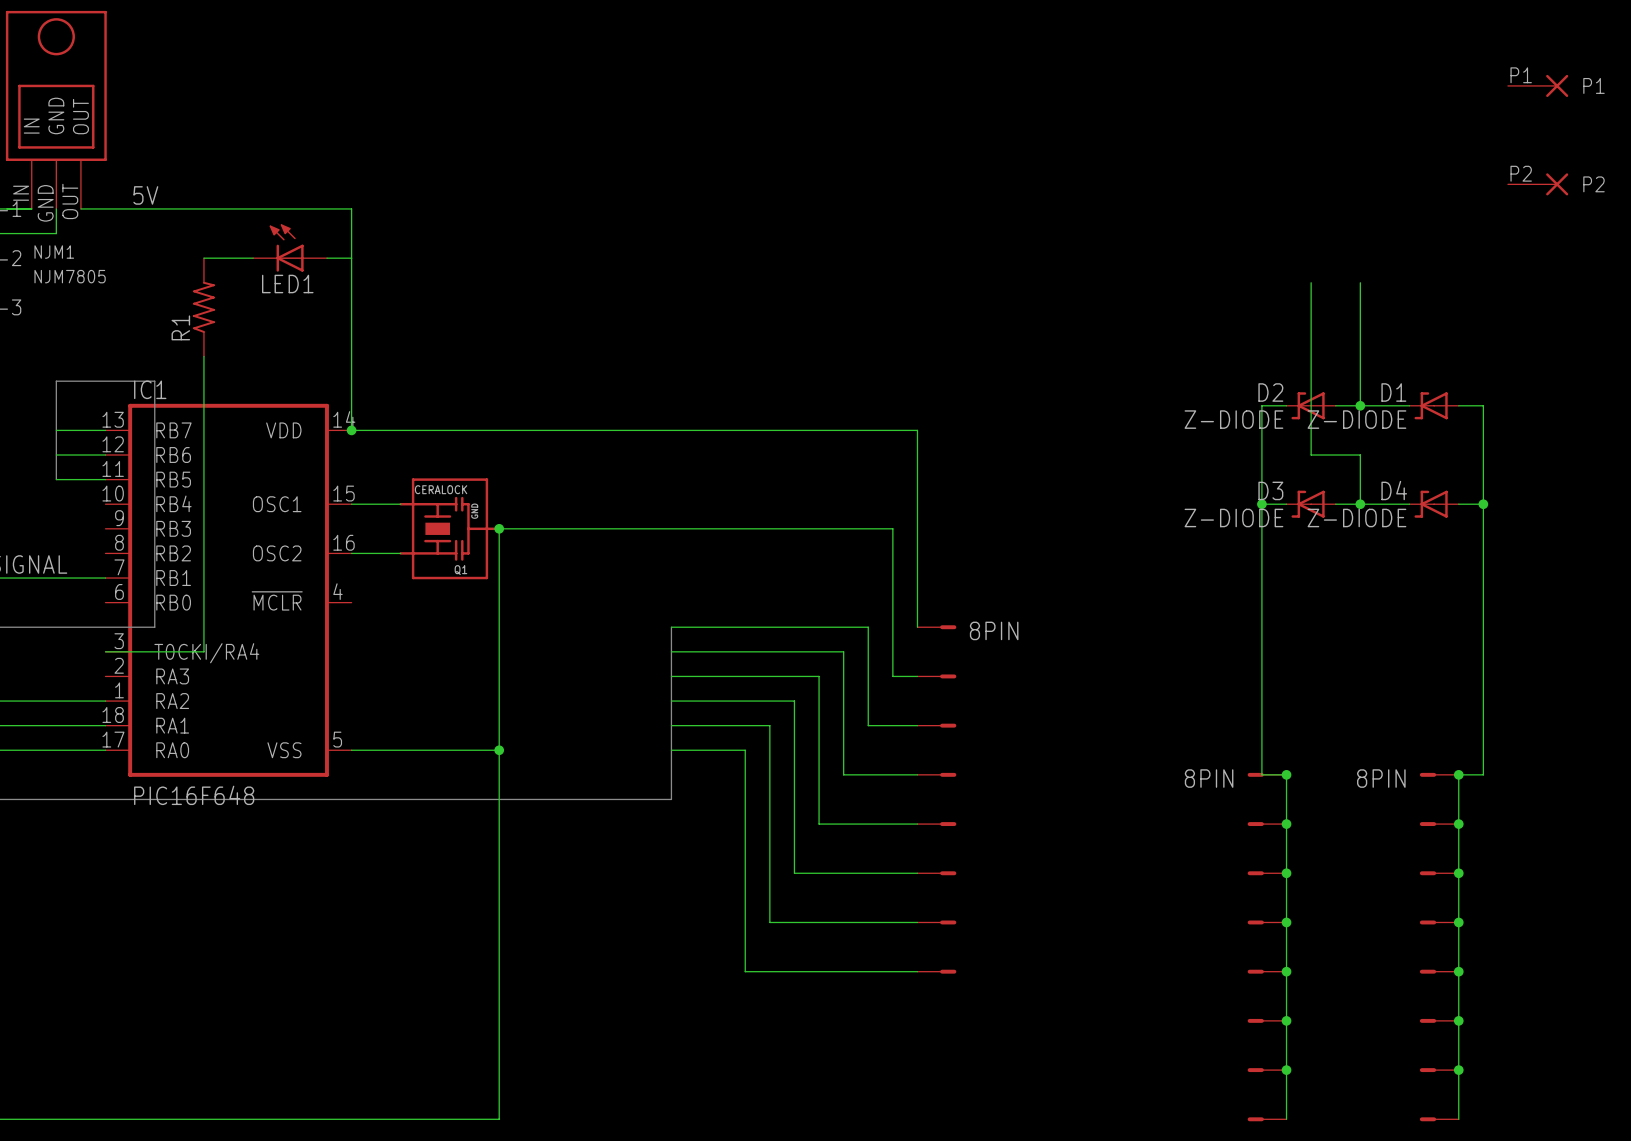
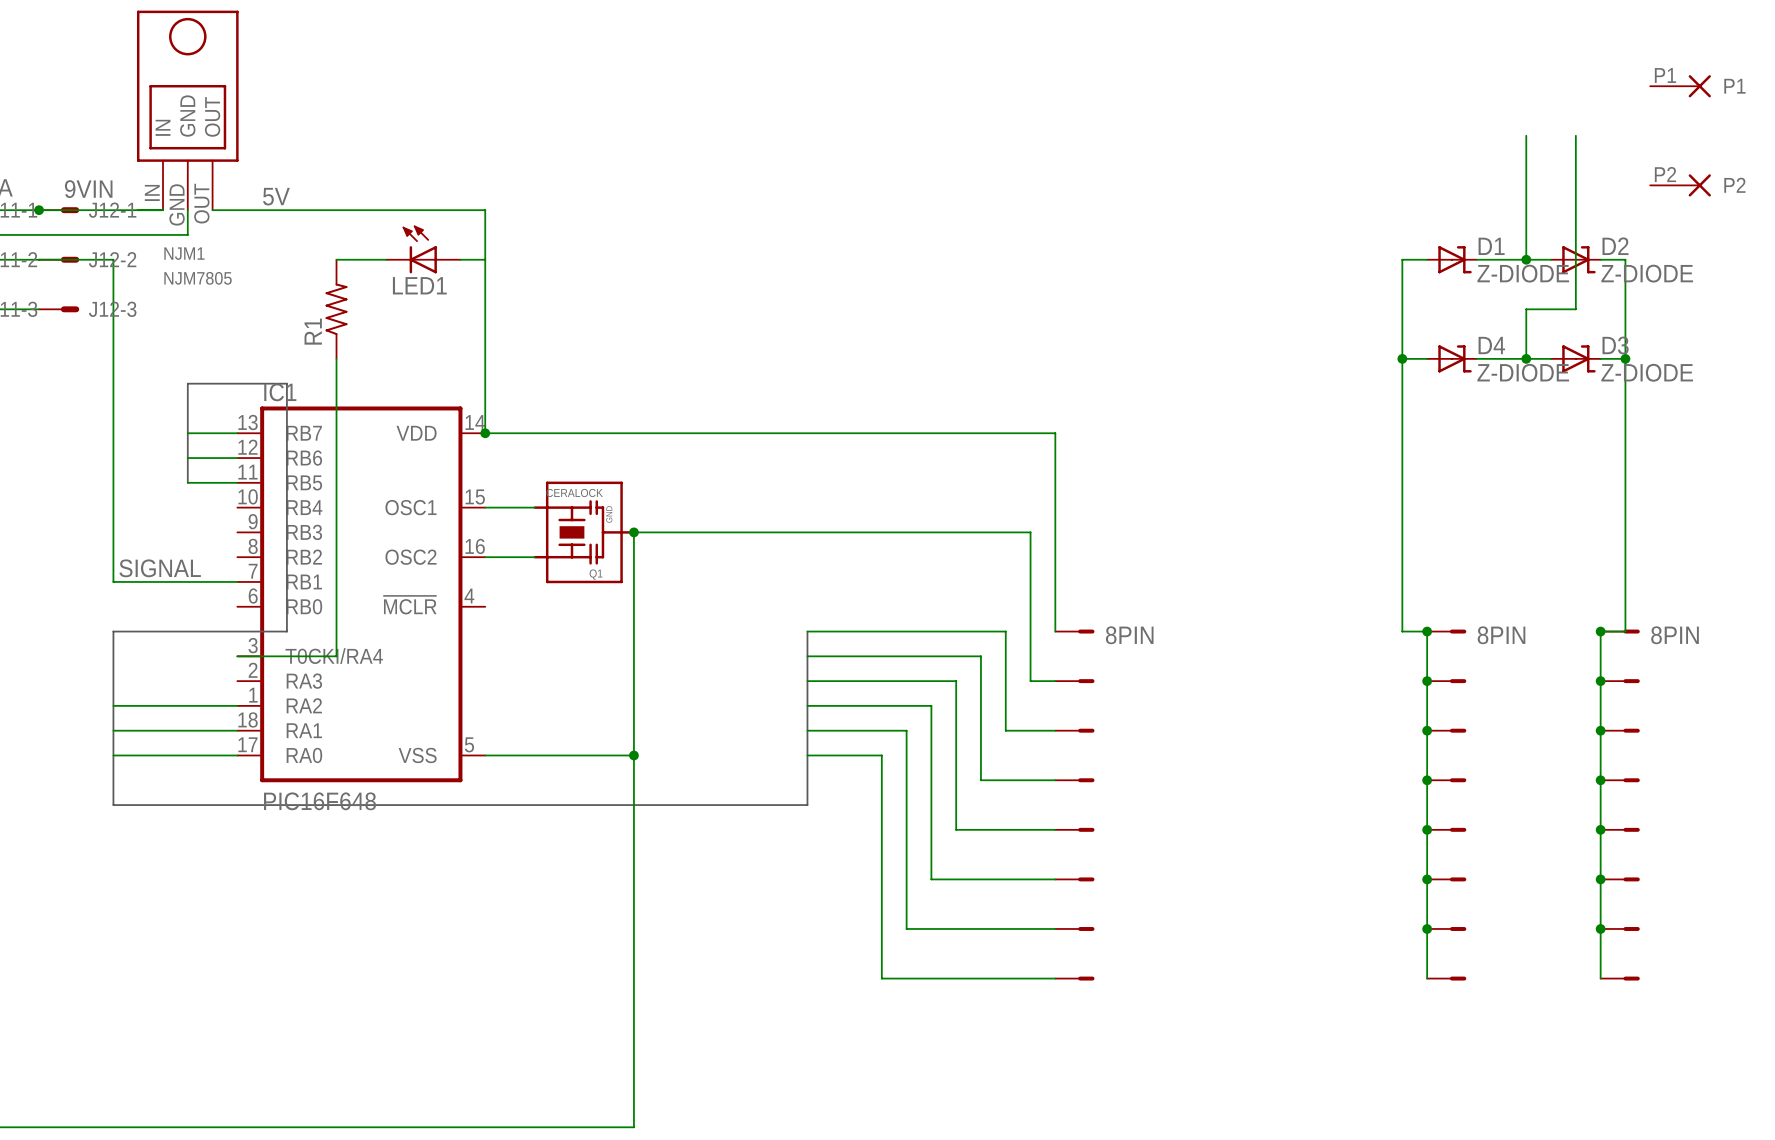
wire: none -> (1575, 135) (1575, 309) (1526, 309) (1526, 358)
junction: none -> (1526, 259)
wire: (1311, 282) (1311, 455) (1360, 455) (1360, 504) -> none
wire: (1360, 282) (1360, 405) -> (1526, 135) (1526, 259)
junction: none -> (1402, 358)
junction: none -> (1526, 358)
junction: none -> (1625, 358)
wire: (1261, 405) (1286, 405) -> (1402, 408) (1402, 259) (1427, 259)
D2 flip: as is (1308, 405) -> left-right (1578, 259)
D2 position: (1311, 405) -> (1575, 259)
wire: (1335, 405) (1409, 405) -> (1476, 259) (1551, 259)
junction: (1360, 405) -> none
D1 flip: as is (1431, 405) -> left-right (1455, 259)
D1 position: (1434, 405) -> (1451, 259)
wire: (1458, 405) (1483, 405) -> (1600, 259) (1625, 259) (1625, 408)
wire: (1261, 504) (1286, 504) -> (1402, 358) (1427, 358)
junction: (1261, 504) -> none
D3 flip: as is (1308, 504) -> left-right (1578, 358)
D3 position: (1311, 504) -> (1575, 358)
wire: (1335, 504) (1409, 504) -> (1476, 358) (1551, 358)
junction: (1360, 504) -> none
D4 flip: as is (1431, 504) -> left-right (1455, 358)
D4 position: (1434, 504) -> (1451, 358)
wire: (1458, 504) (1483, 504) -> (1600, 358) (1625, 358)
junction: (1483, 504) -> none
wire: (1261, 627) (1261, 774) (1286, 774) -> (1402, 631) (1427, 631) (1427, 780)
junction: none -> (1427, 631)
part: none -> 8PIN (1446, 631)
junction: none -> (1600, 631)
part: none -> 8PIN (1620, 631)
wire: (1483, 627) (1483, 774) (1458, 774) -> (1625, 631) (1600, 631) (1600, 780)
junction: none -> (1427, 681)
part: none -> (1446, 681)
junction: none -> (1600, 681)
part: none -> (1620, 681)
junction: none -> (1427, 730)
part: none -> (1446, 730)
junction: none -> (1600, 730)
part: none -> (1620, 730)
part: 8PIN (1267, 774) -> none
part: none -> (1446, 780)
part: 8PIN (1439, 774) -> none
part: none -> (1620, 780)
part: (1267, 824) -> none
part: none -> (1446, 829)
part: (1439, 824) -> none
part: none -> (1620, 829)
part: (1267, 873) -> none
part: none -> (1446, 879)
part: (1439, 873) -> none
part: none -> (1620, 879)
part: (1267, 922) -> none
part: none -> (1446, 928)
part: (1439, 922) -> none
part: none -> (1620, 928)
part: (1267, 971) -> none
wire: (1286, 971) (1286, 1119) -> none
junction: (1286, 971) -> none
part: none -> (1446, 978)
part: (1439, 971) -> none
wire: (1458, 971) (1458, 1119) -> none
junction: (1458, 971) -> none
part: none -> (1620, 978)
part: (1267, 1020) -> none
junction: (1286, 1020) -> none
part: (1439, 1020) -> none
junction: (1458, 1020) -> none
part: (1267, 1070) -> none
junction: (1286, 1070) -> none
part: (1439, 1070) -> none
junction: (1458, 1070) -> none
part: (1267, 1119) -> none
part: (1439, 1119) -> none

